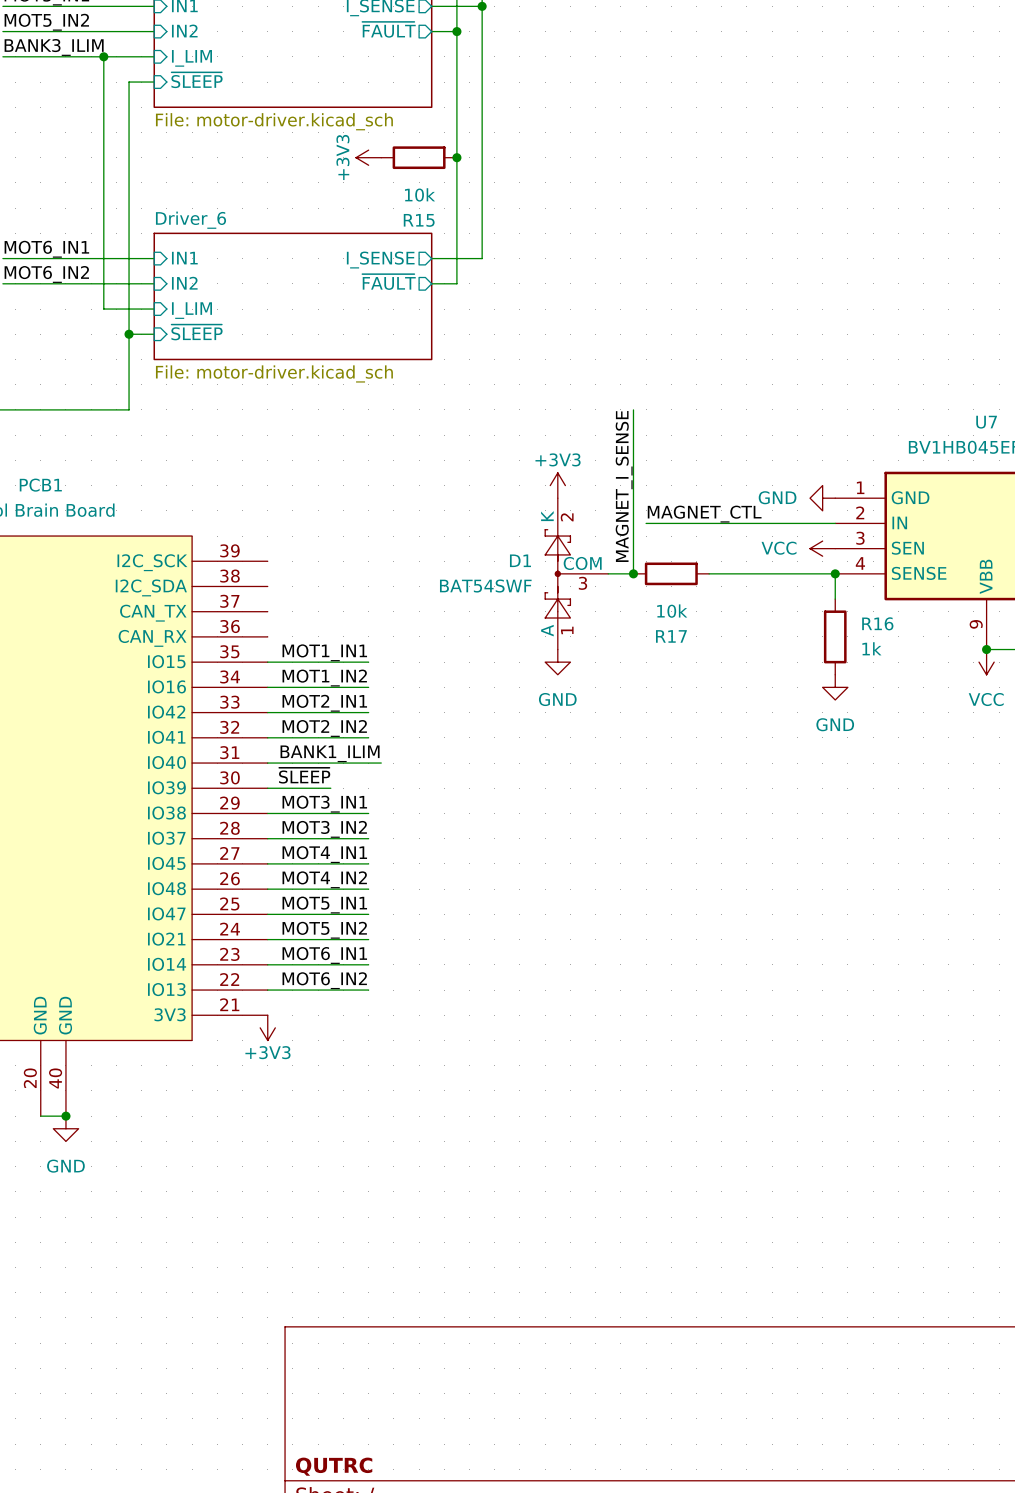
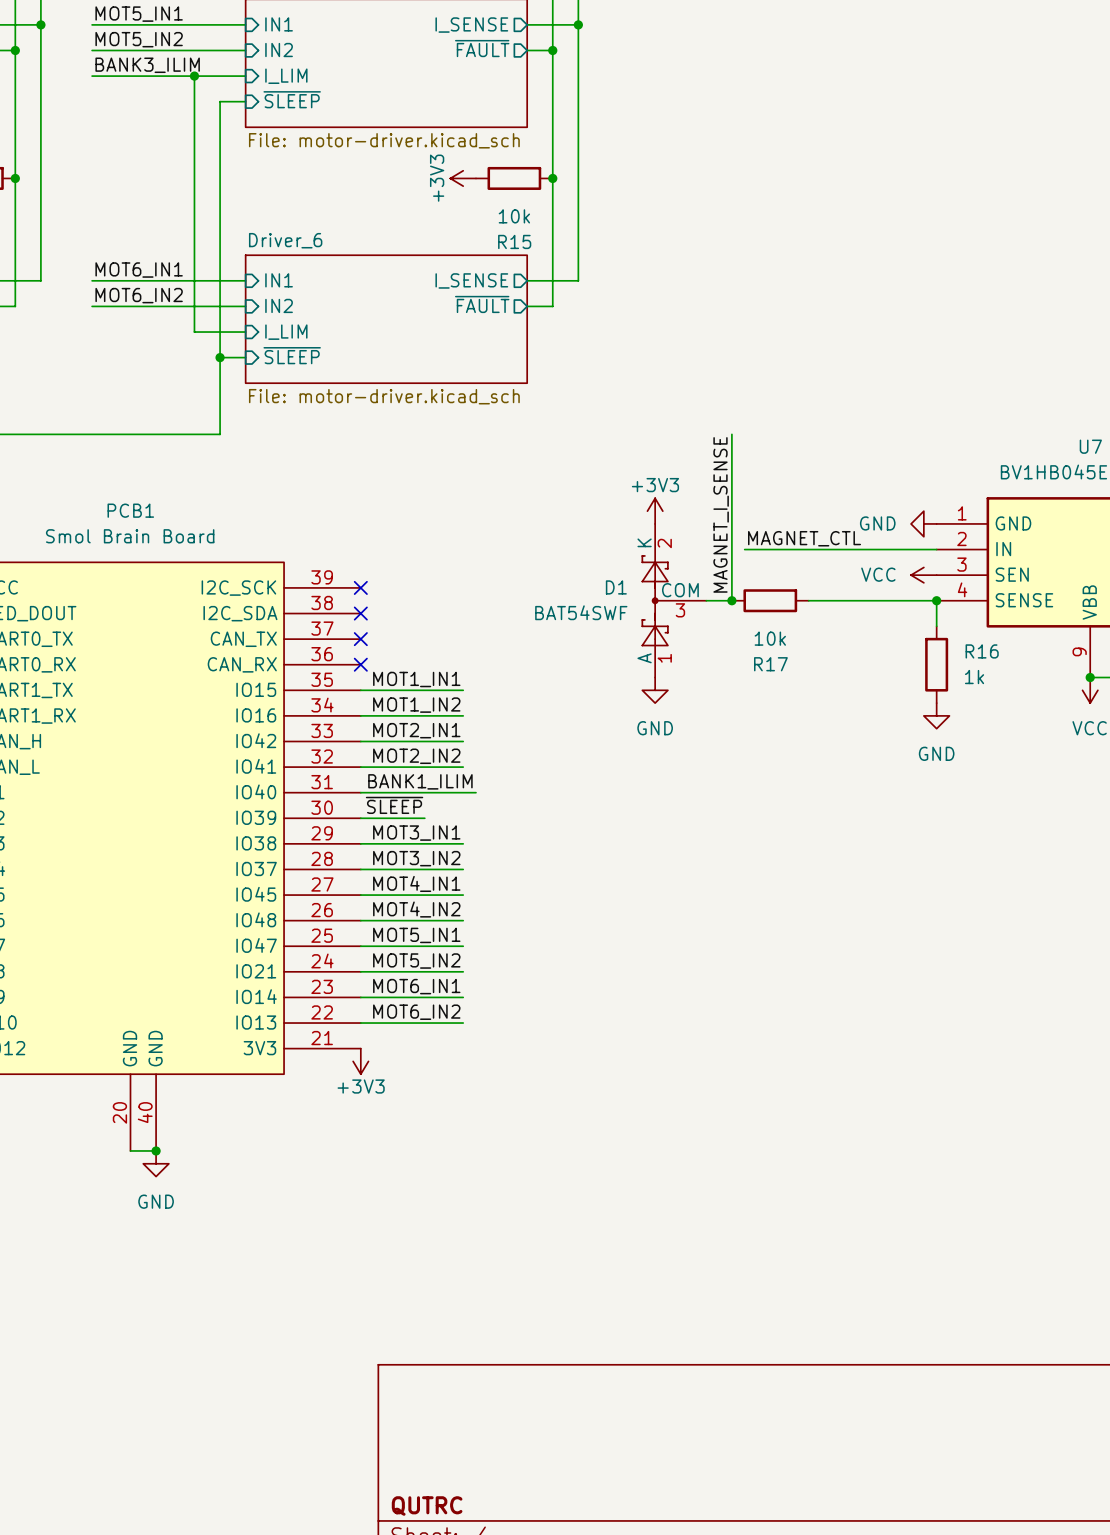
no-connect mark: none -> (360, 587)
no-connect mark: none -> (360, 613)
no-connect mark: none -> (360, 639)
no-connect mark: none -> (360, 664)

